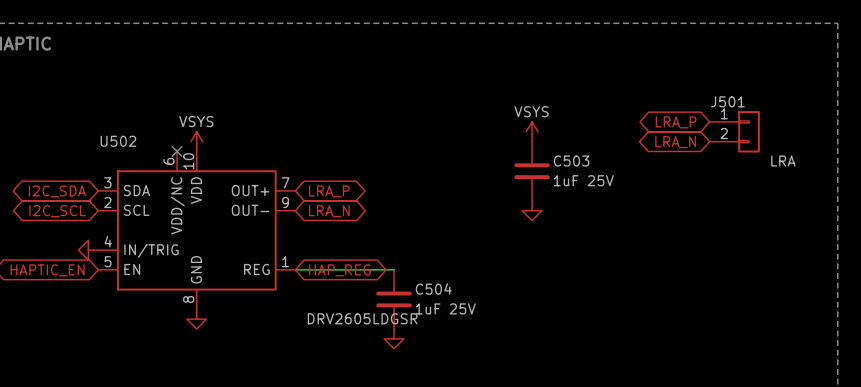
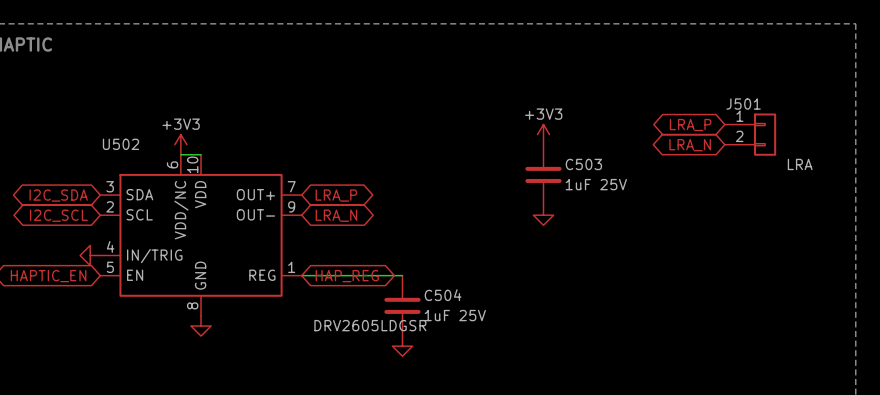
power symbol: VSYS (532, 131) -> +3V3 (543, 134)
power symbol: none -> +3V3 (180, 144)
power symbol: VSYS (196, 141) -> none
wire: none -> (180, 154) (201, 154)
no-connect mark: (177, 151) -> none

